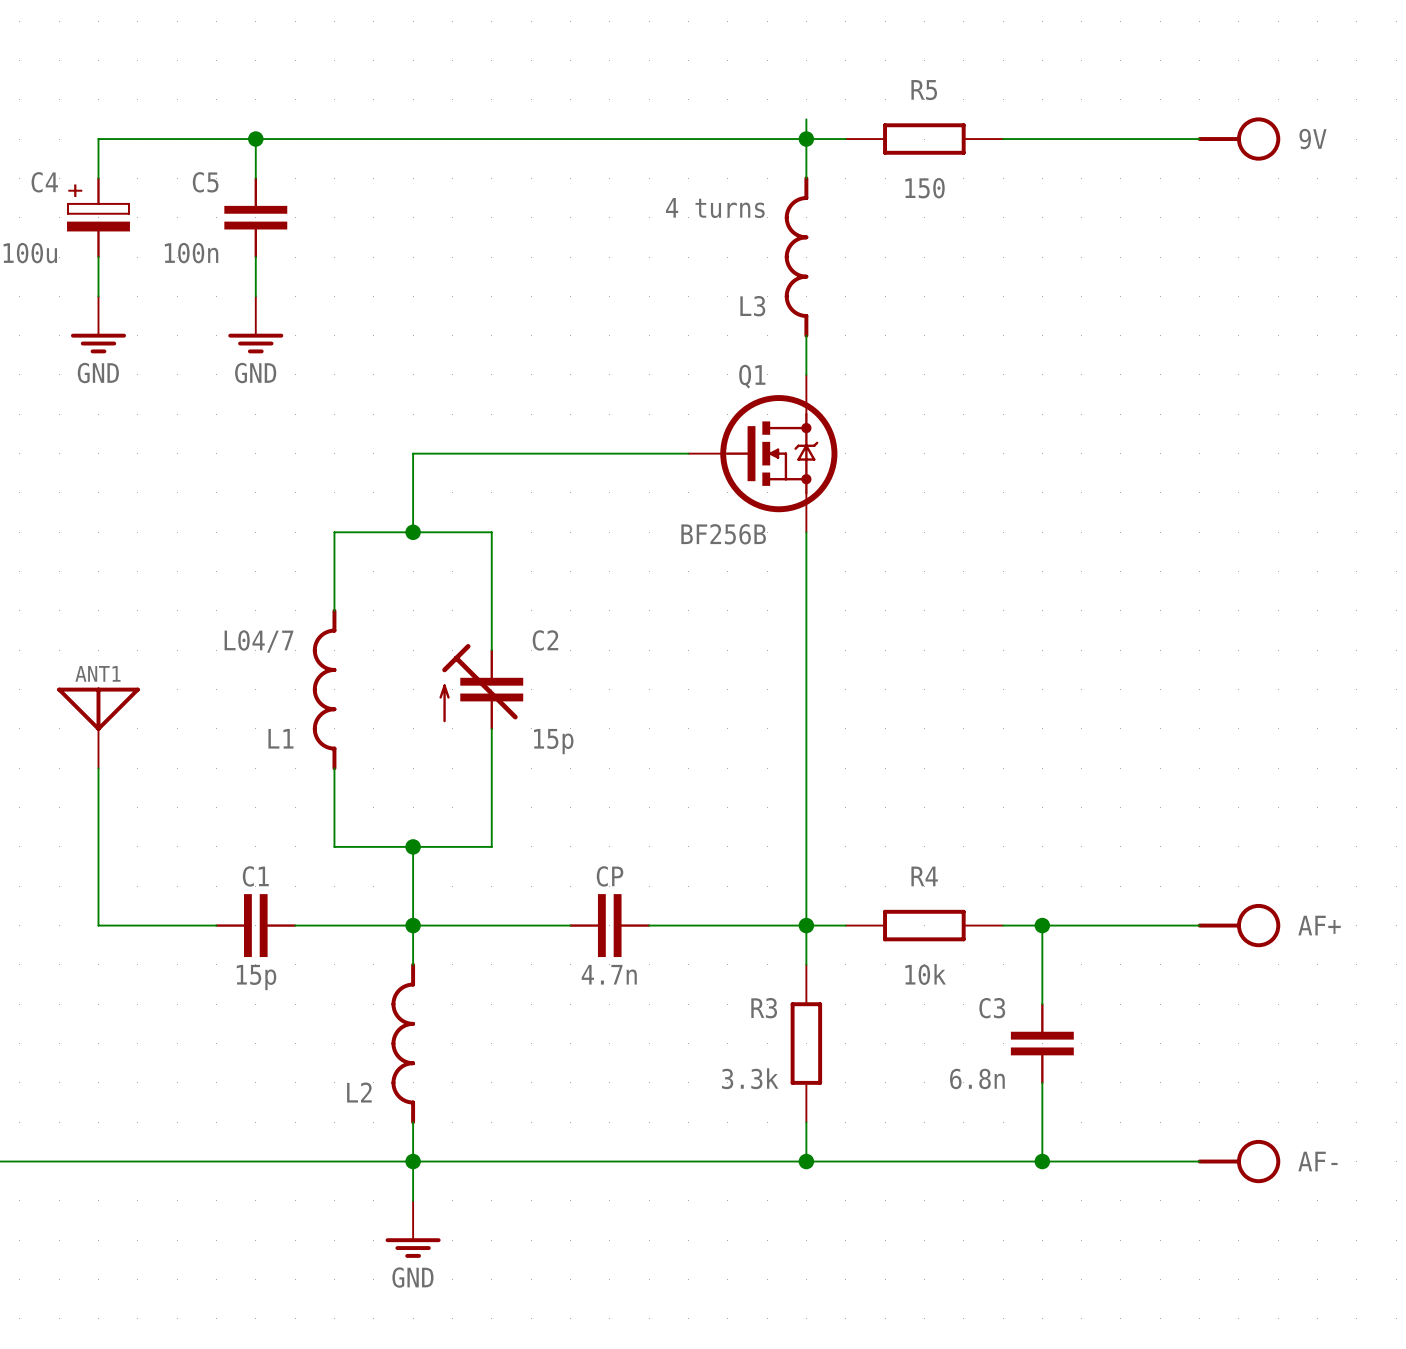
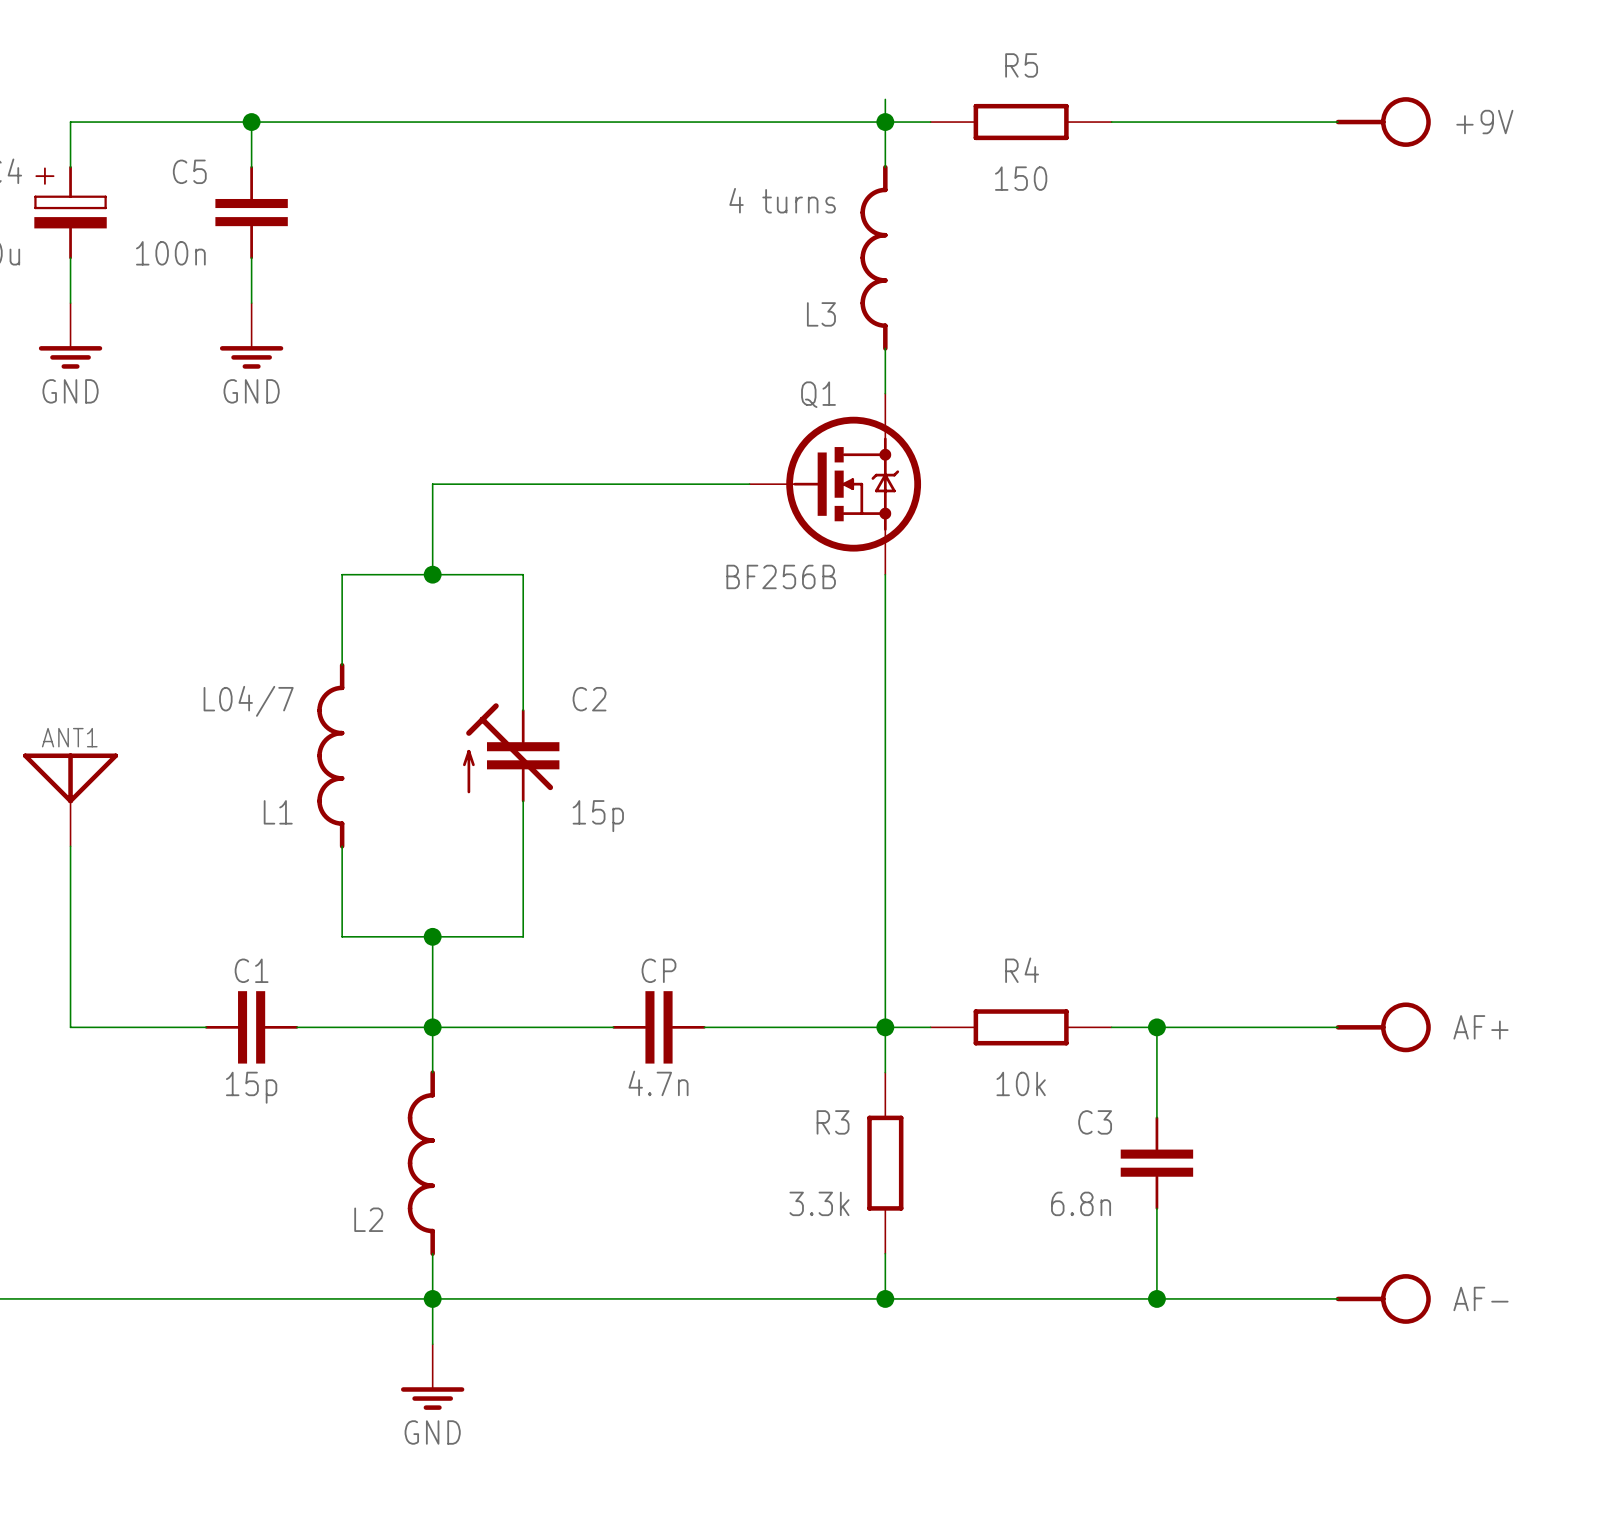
9V name: 9V (1312, 139) -> +9V (1484, 122)

